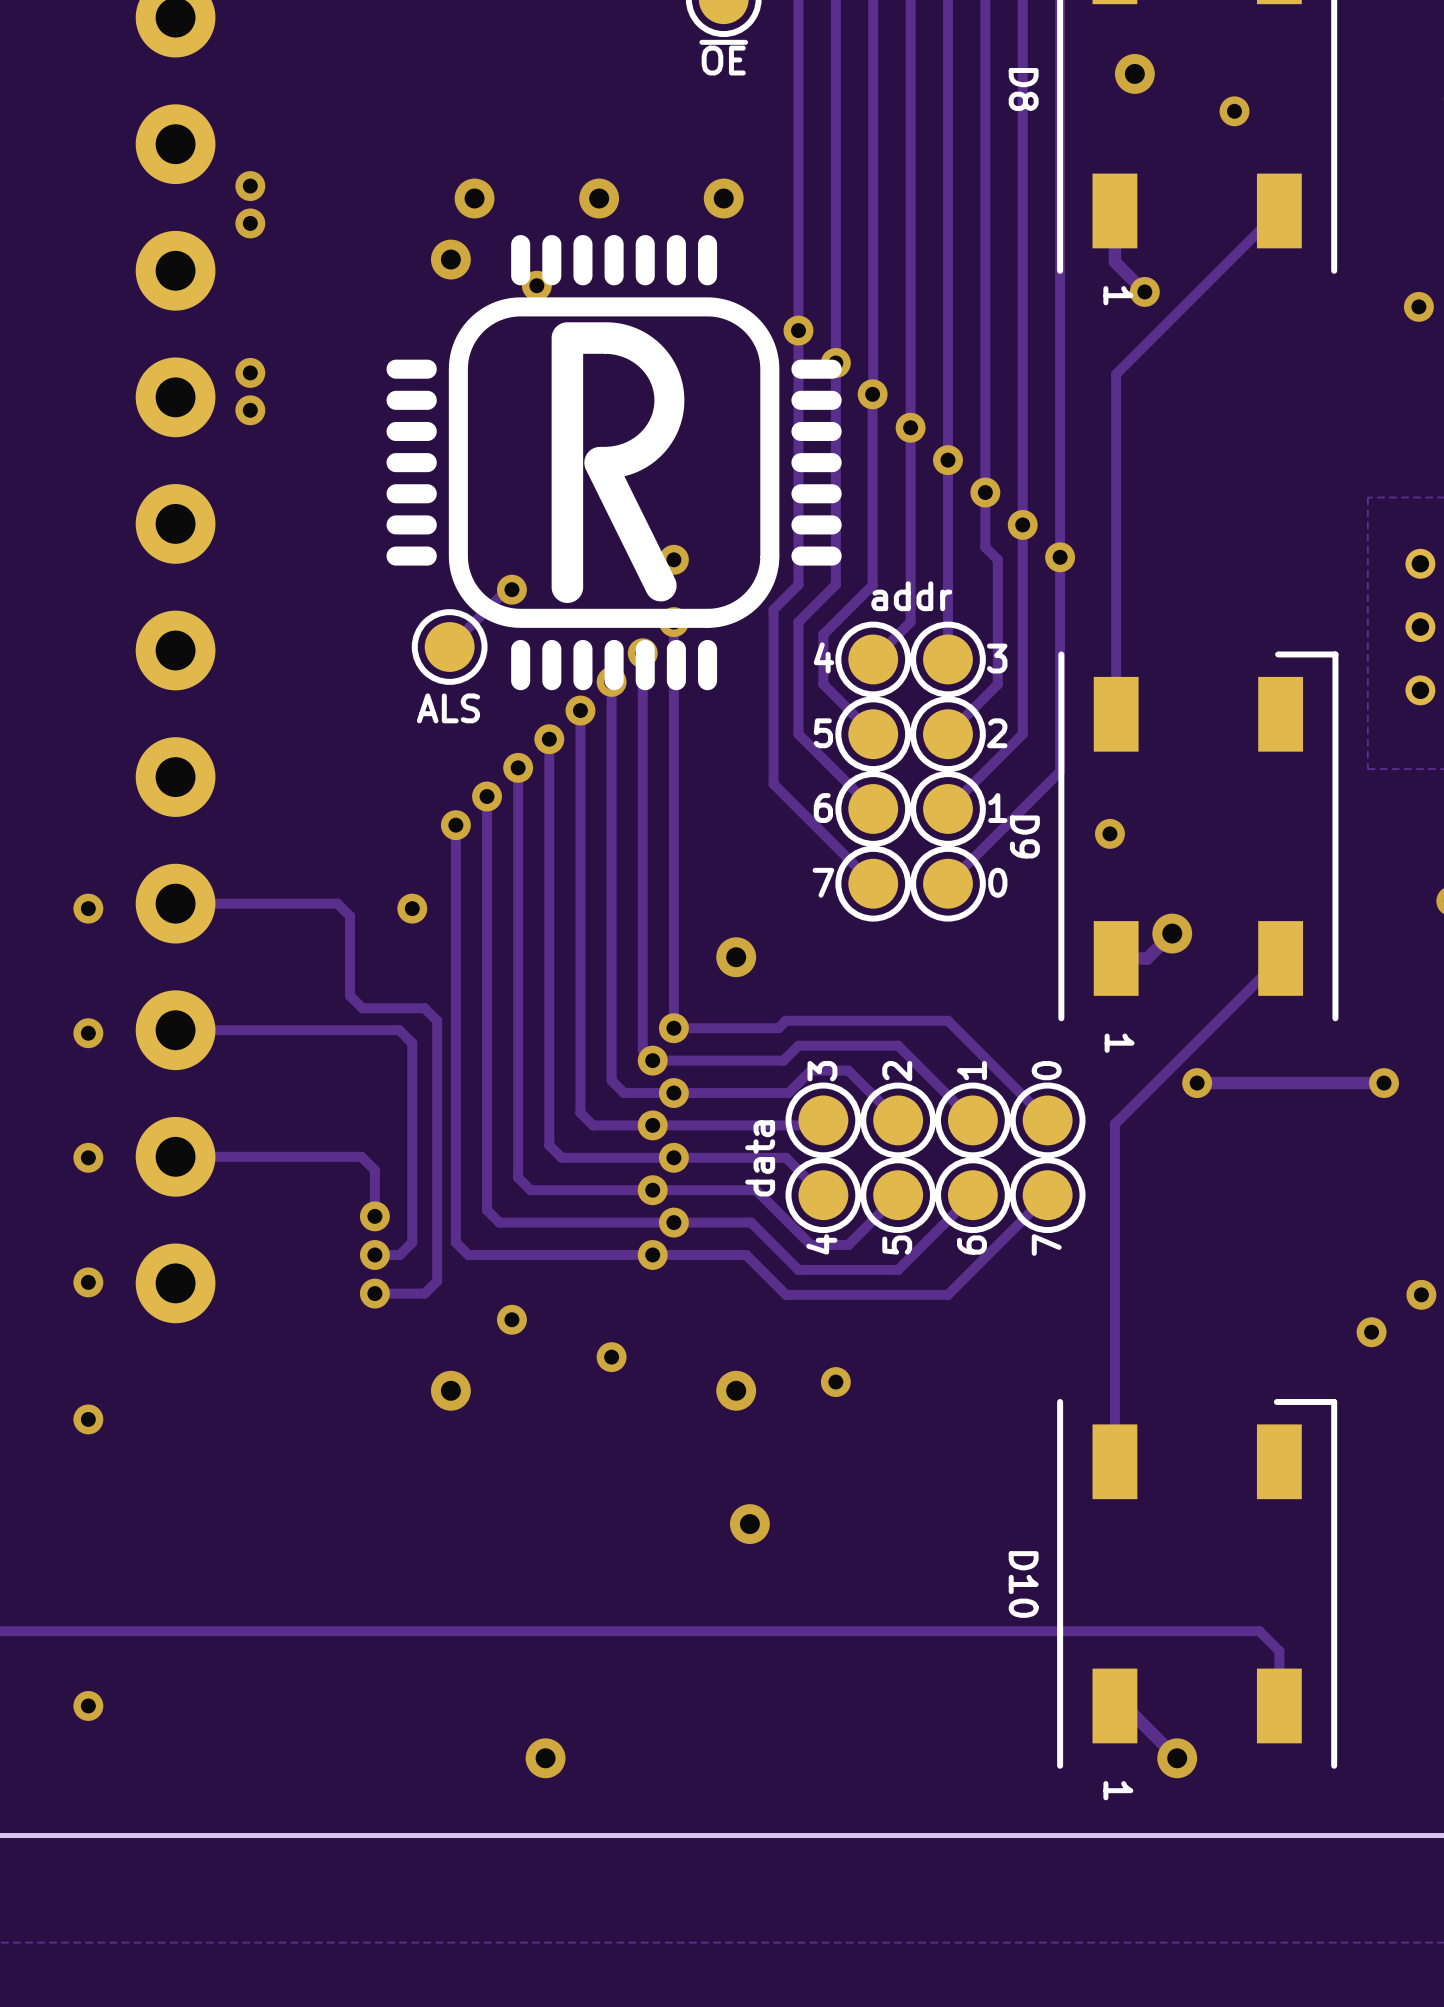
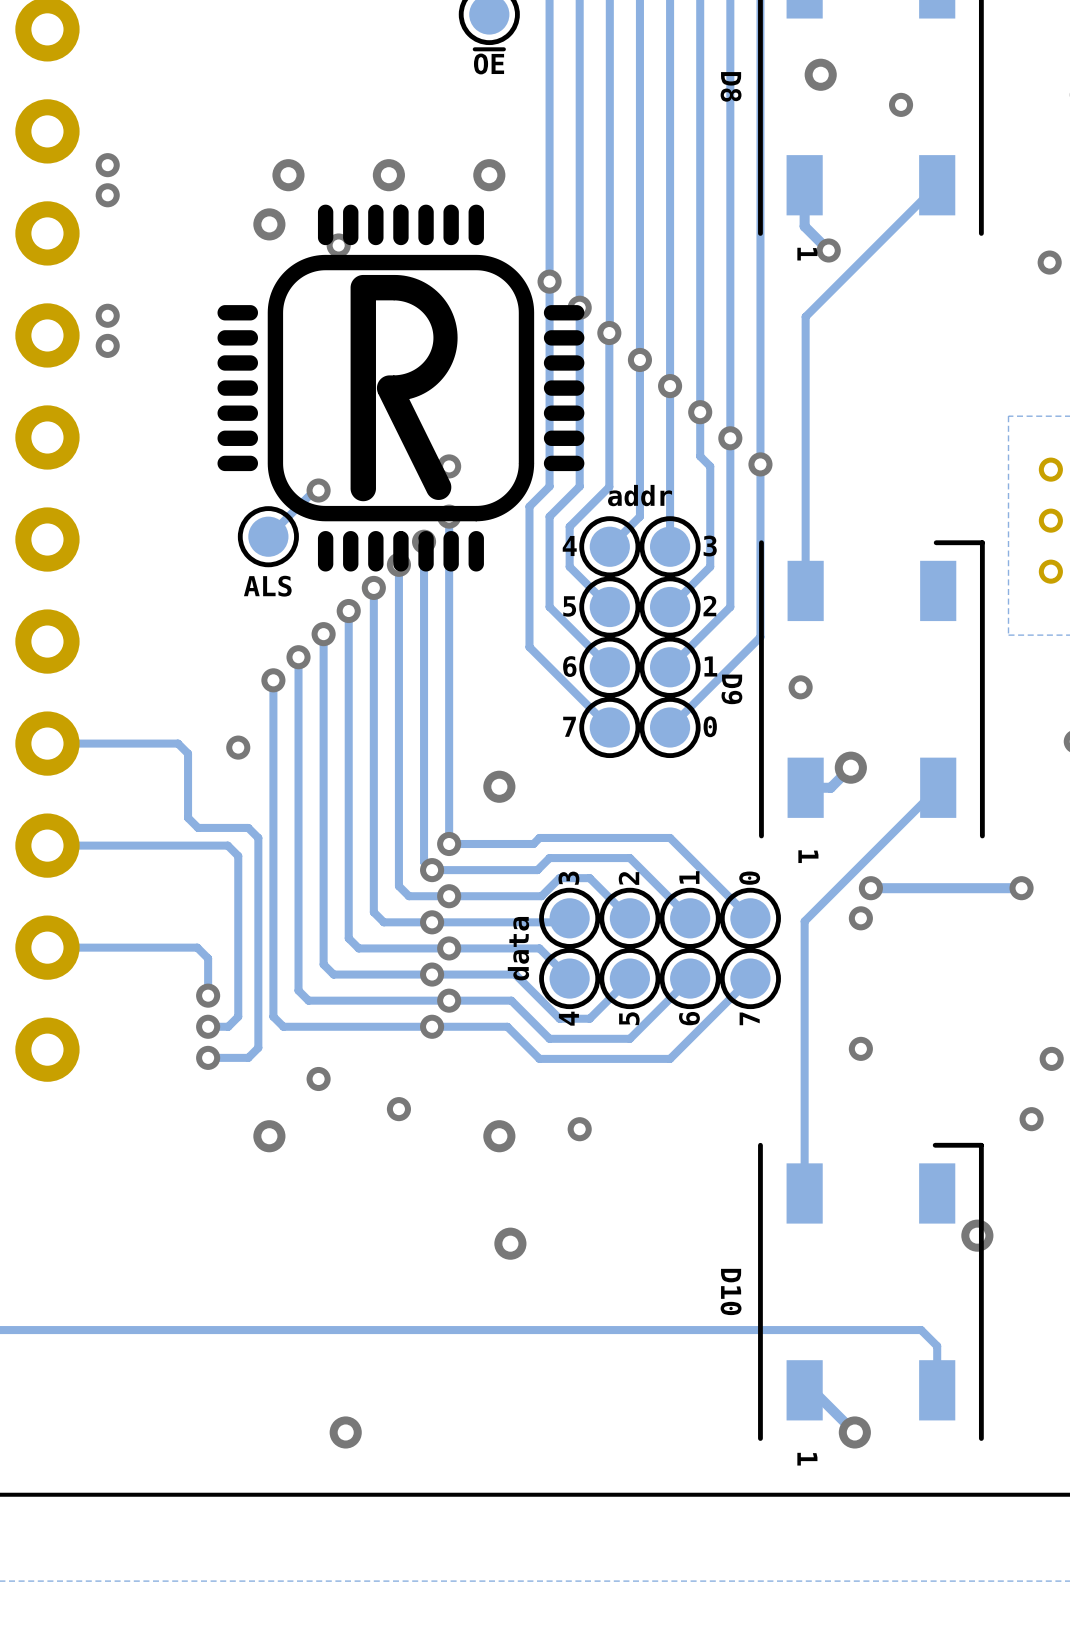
via: none -> (860, 918)
via: none -> (860, 1048)
via position: (1371, 1332) -> (1031, 1119)
via: none -> (977, 1235)

